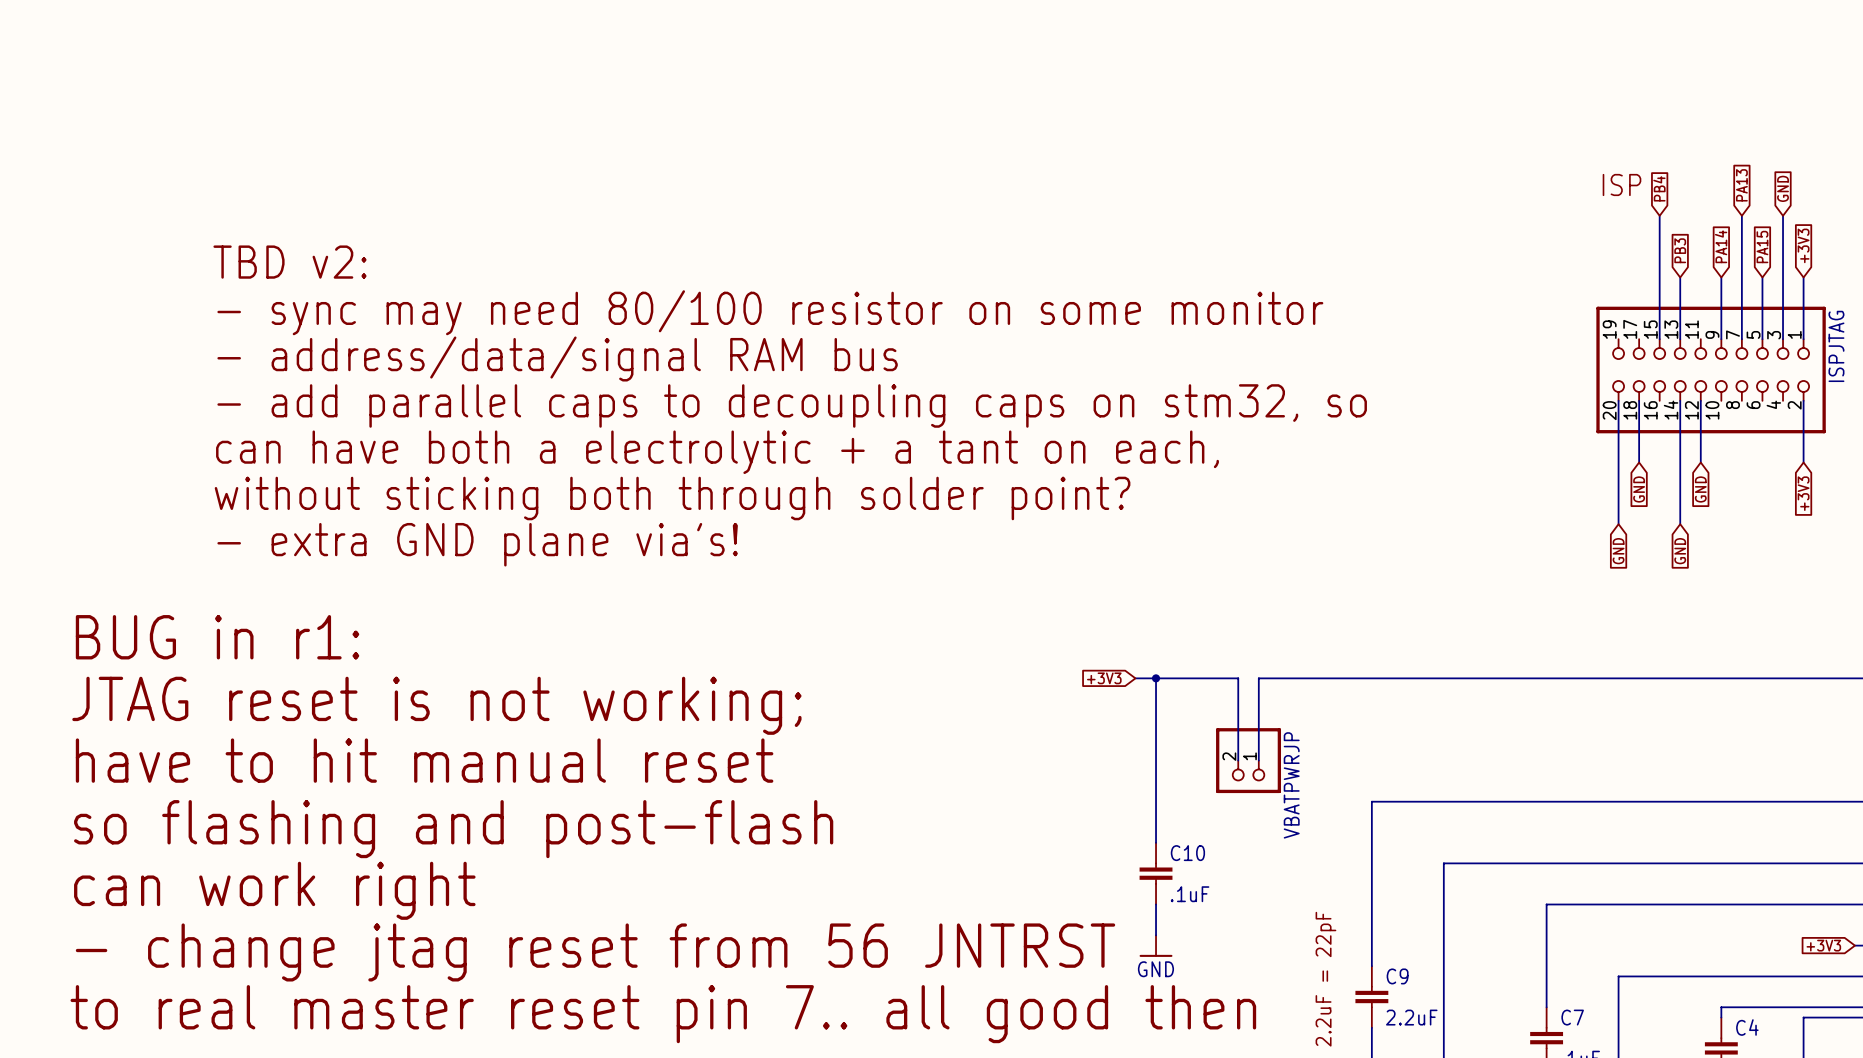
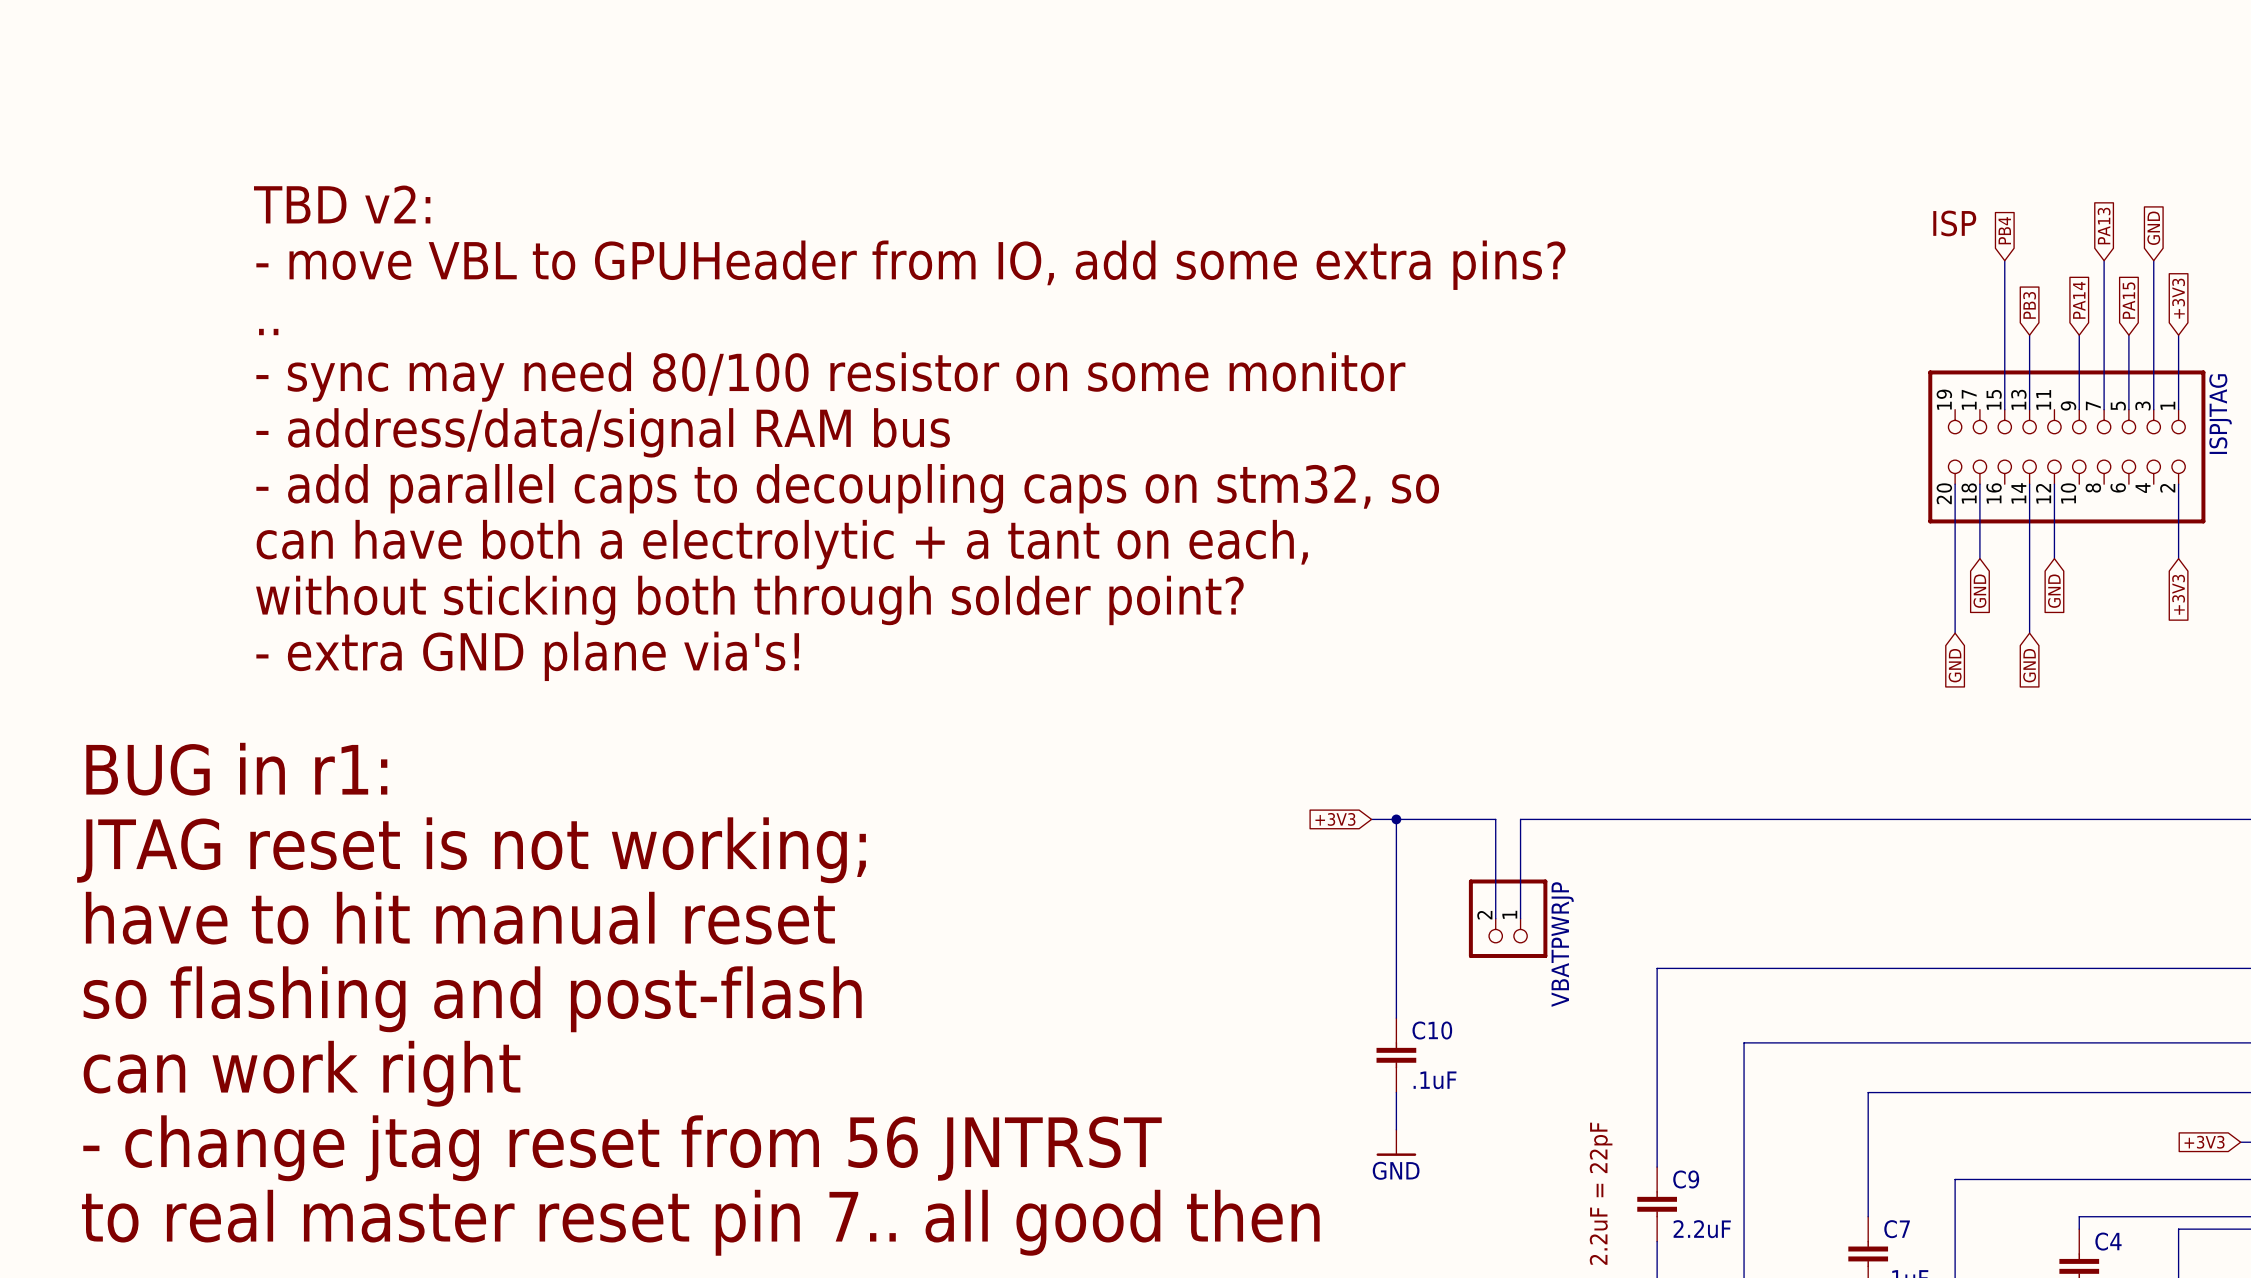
text: none -> TBD v2: (342, 204)
text: none -> - move VBL to GPUHeader from IO, add some extra pins? (910, 265)
text: TBD v2: (289, 262) -> .. (268, 332)

